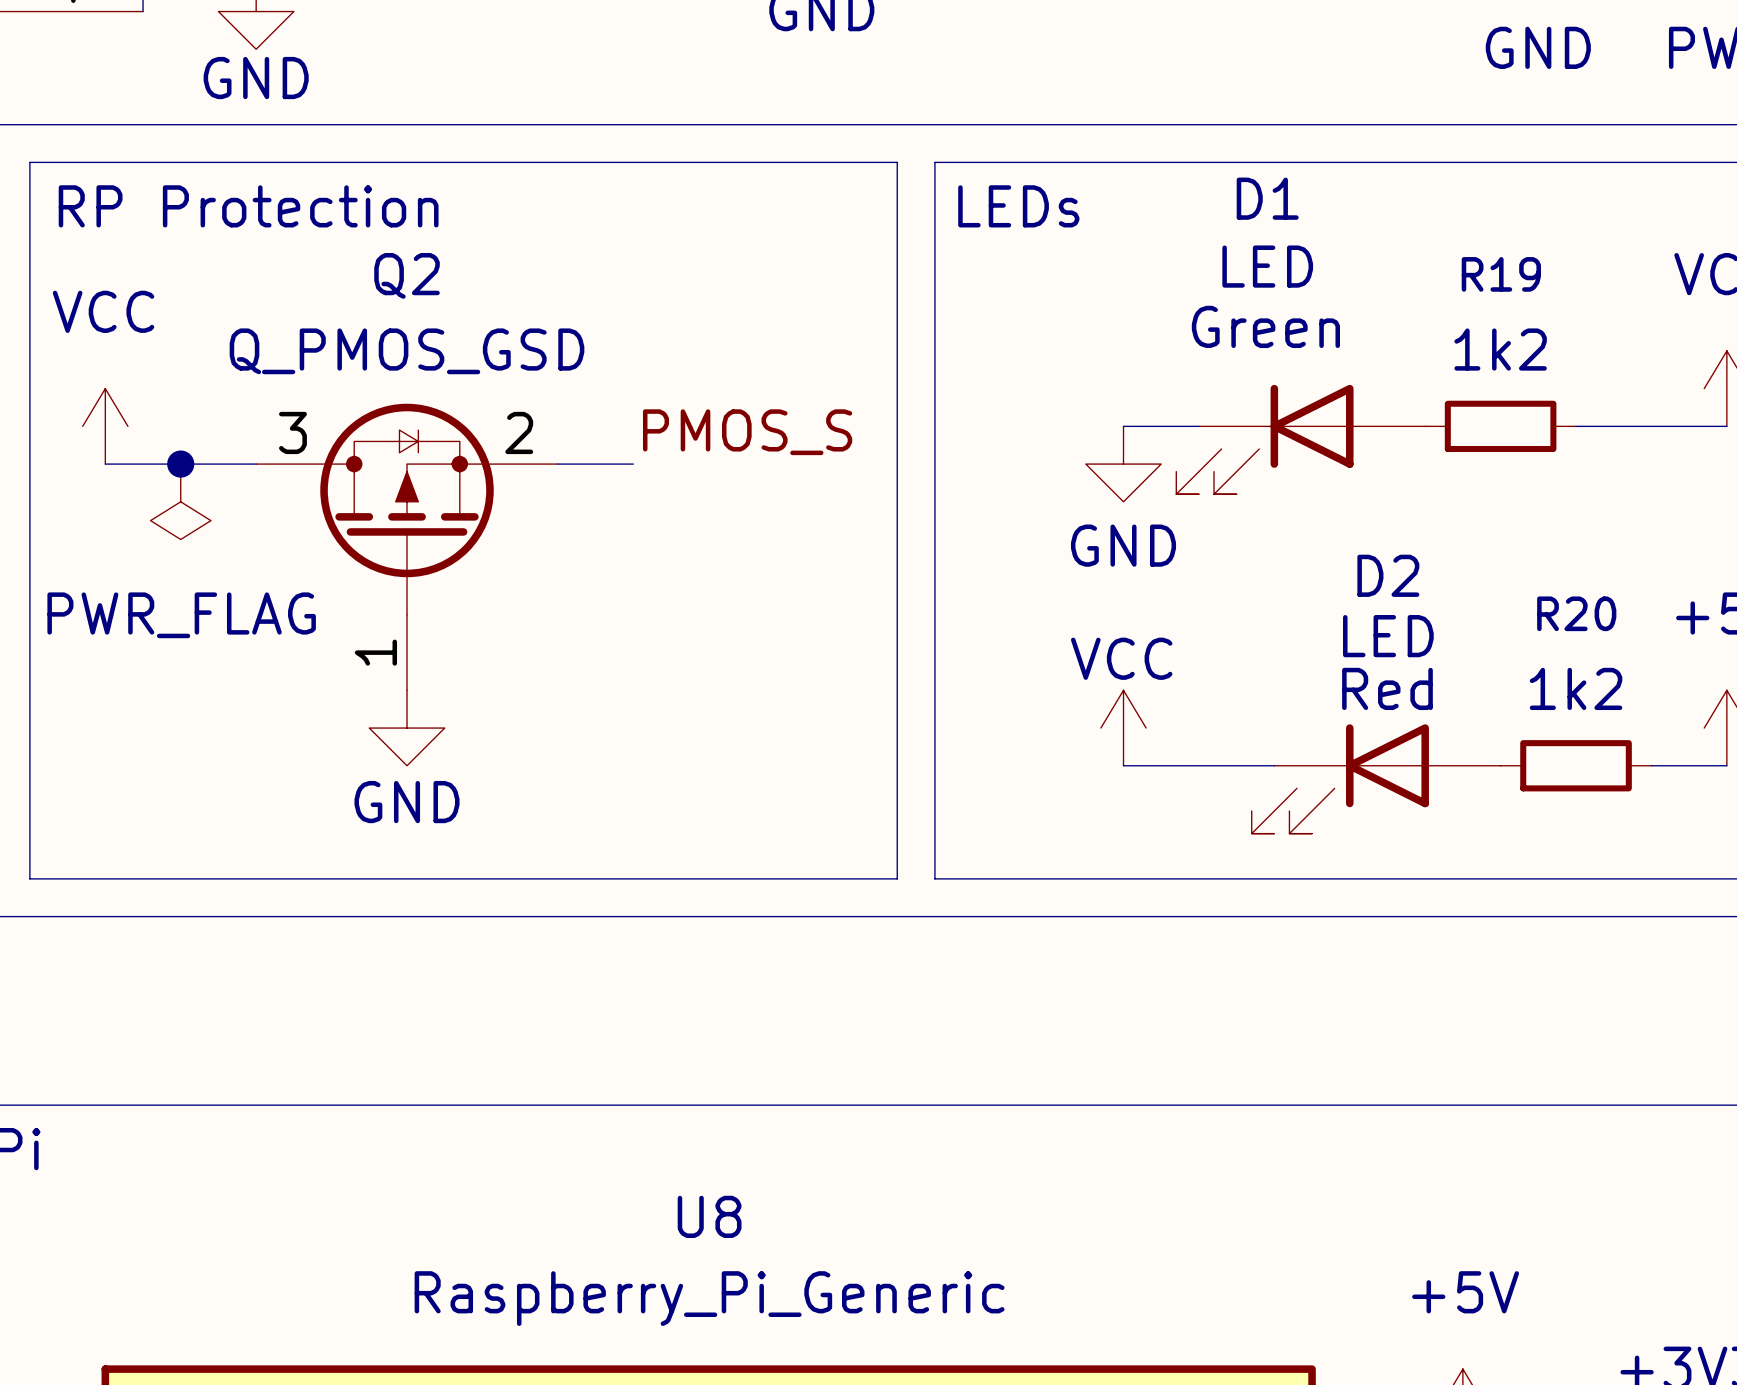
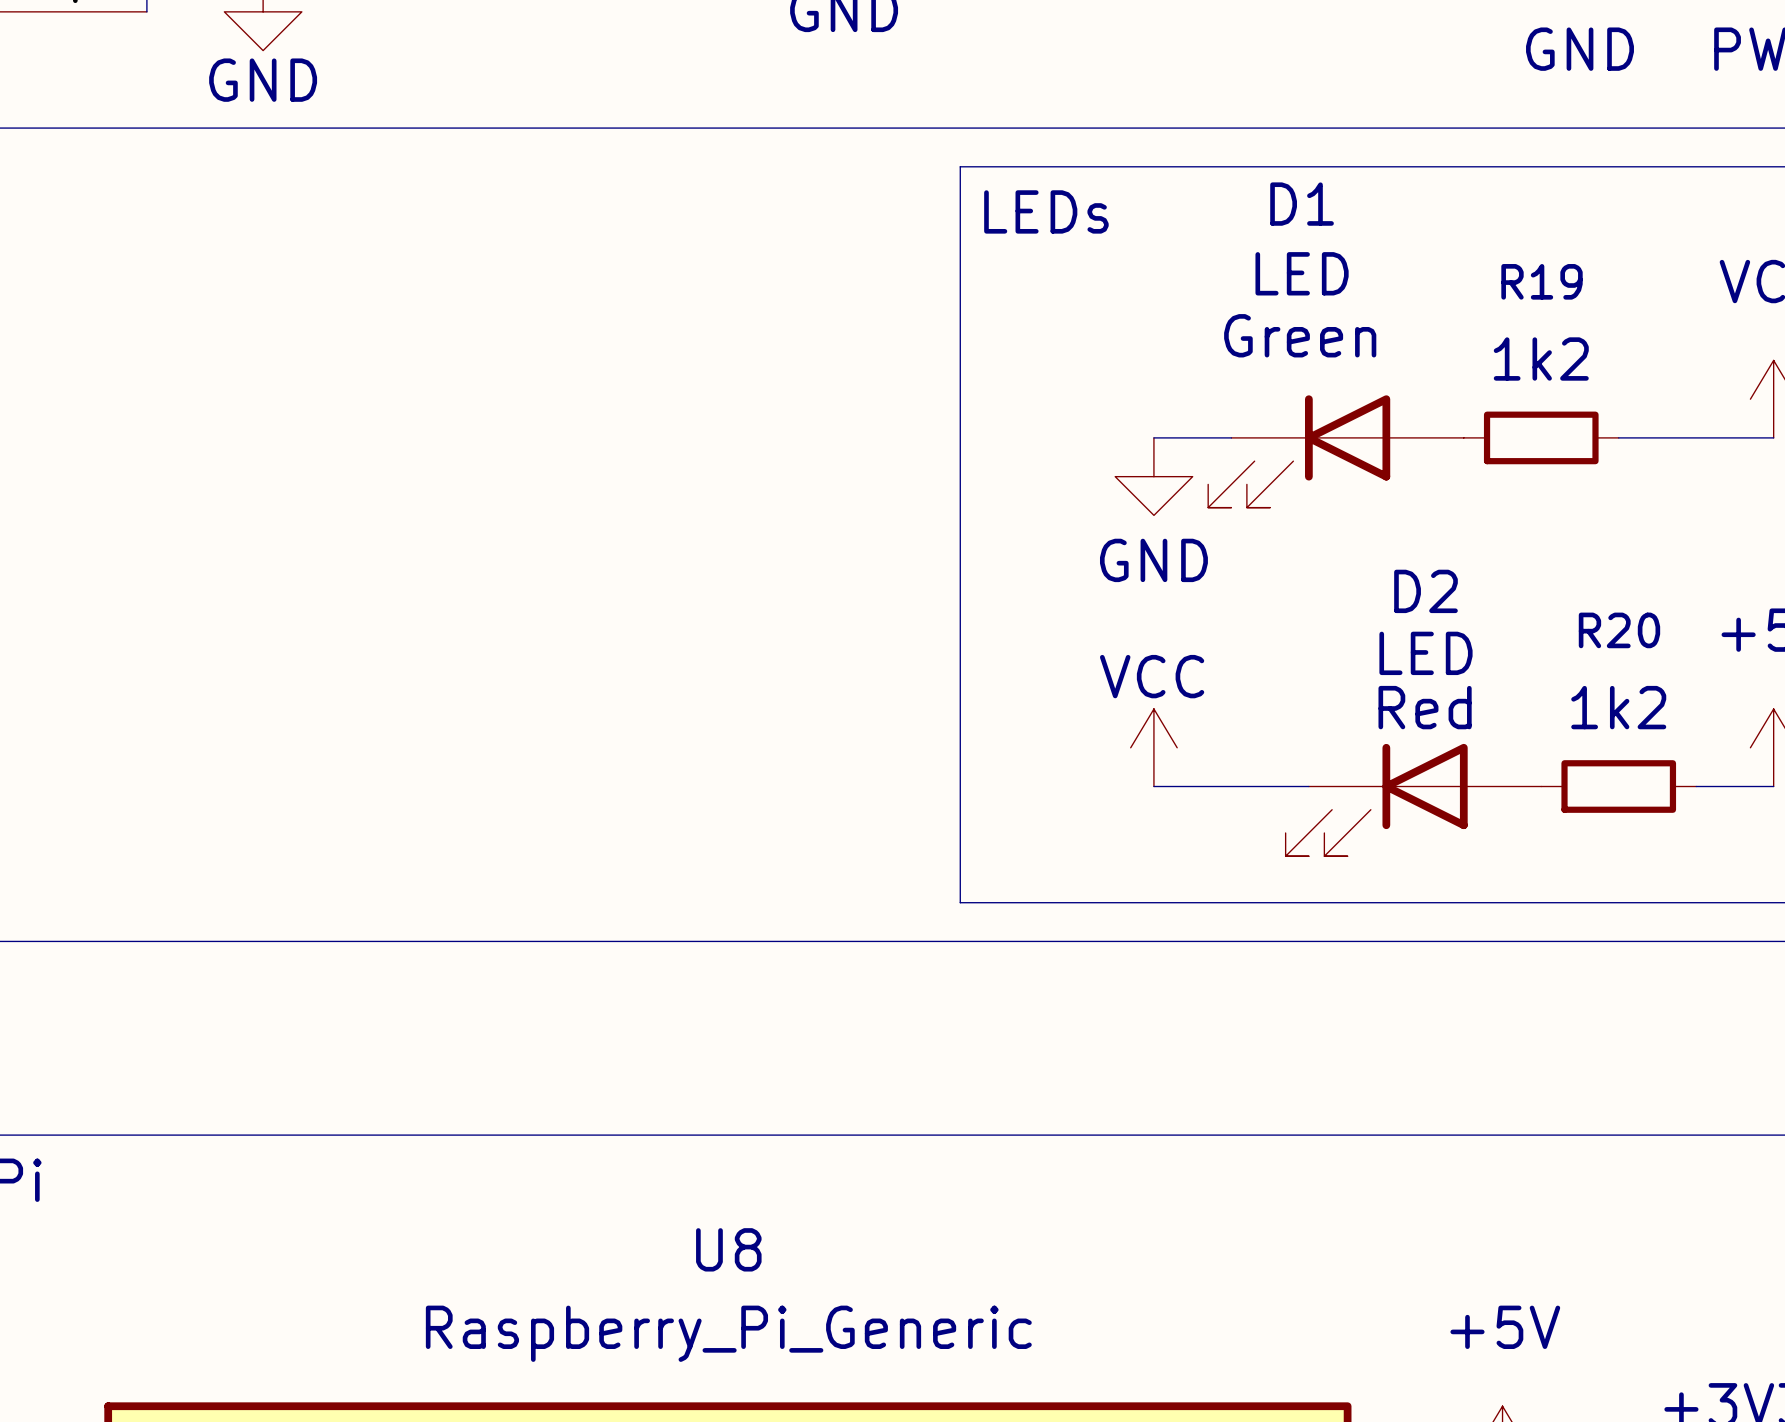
line: (29, 162) (897, 162) (897, 878) (29, 878) (29, 162) -> none
text: RP Protection (248, 206) -> none
power symbol: VCC (105, 426) -> none
label: PMOS_S (747, 432) -> none
wire: (105, 464) (256, 464) -> none
junction: (180, 464) -> none
wire: (557, 464) (633, 464) -> none
power symbol: PWR_FLAG (180, 501) -> none
Q2: Q_PMOS_GSD (407, 547) -> none
power symbol: GND (407, 728) -> none

